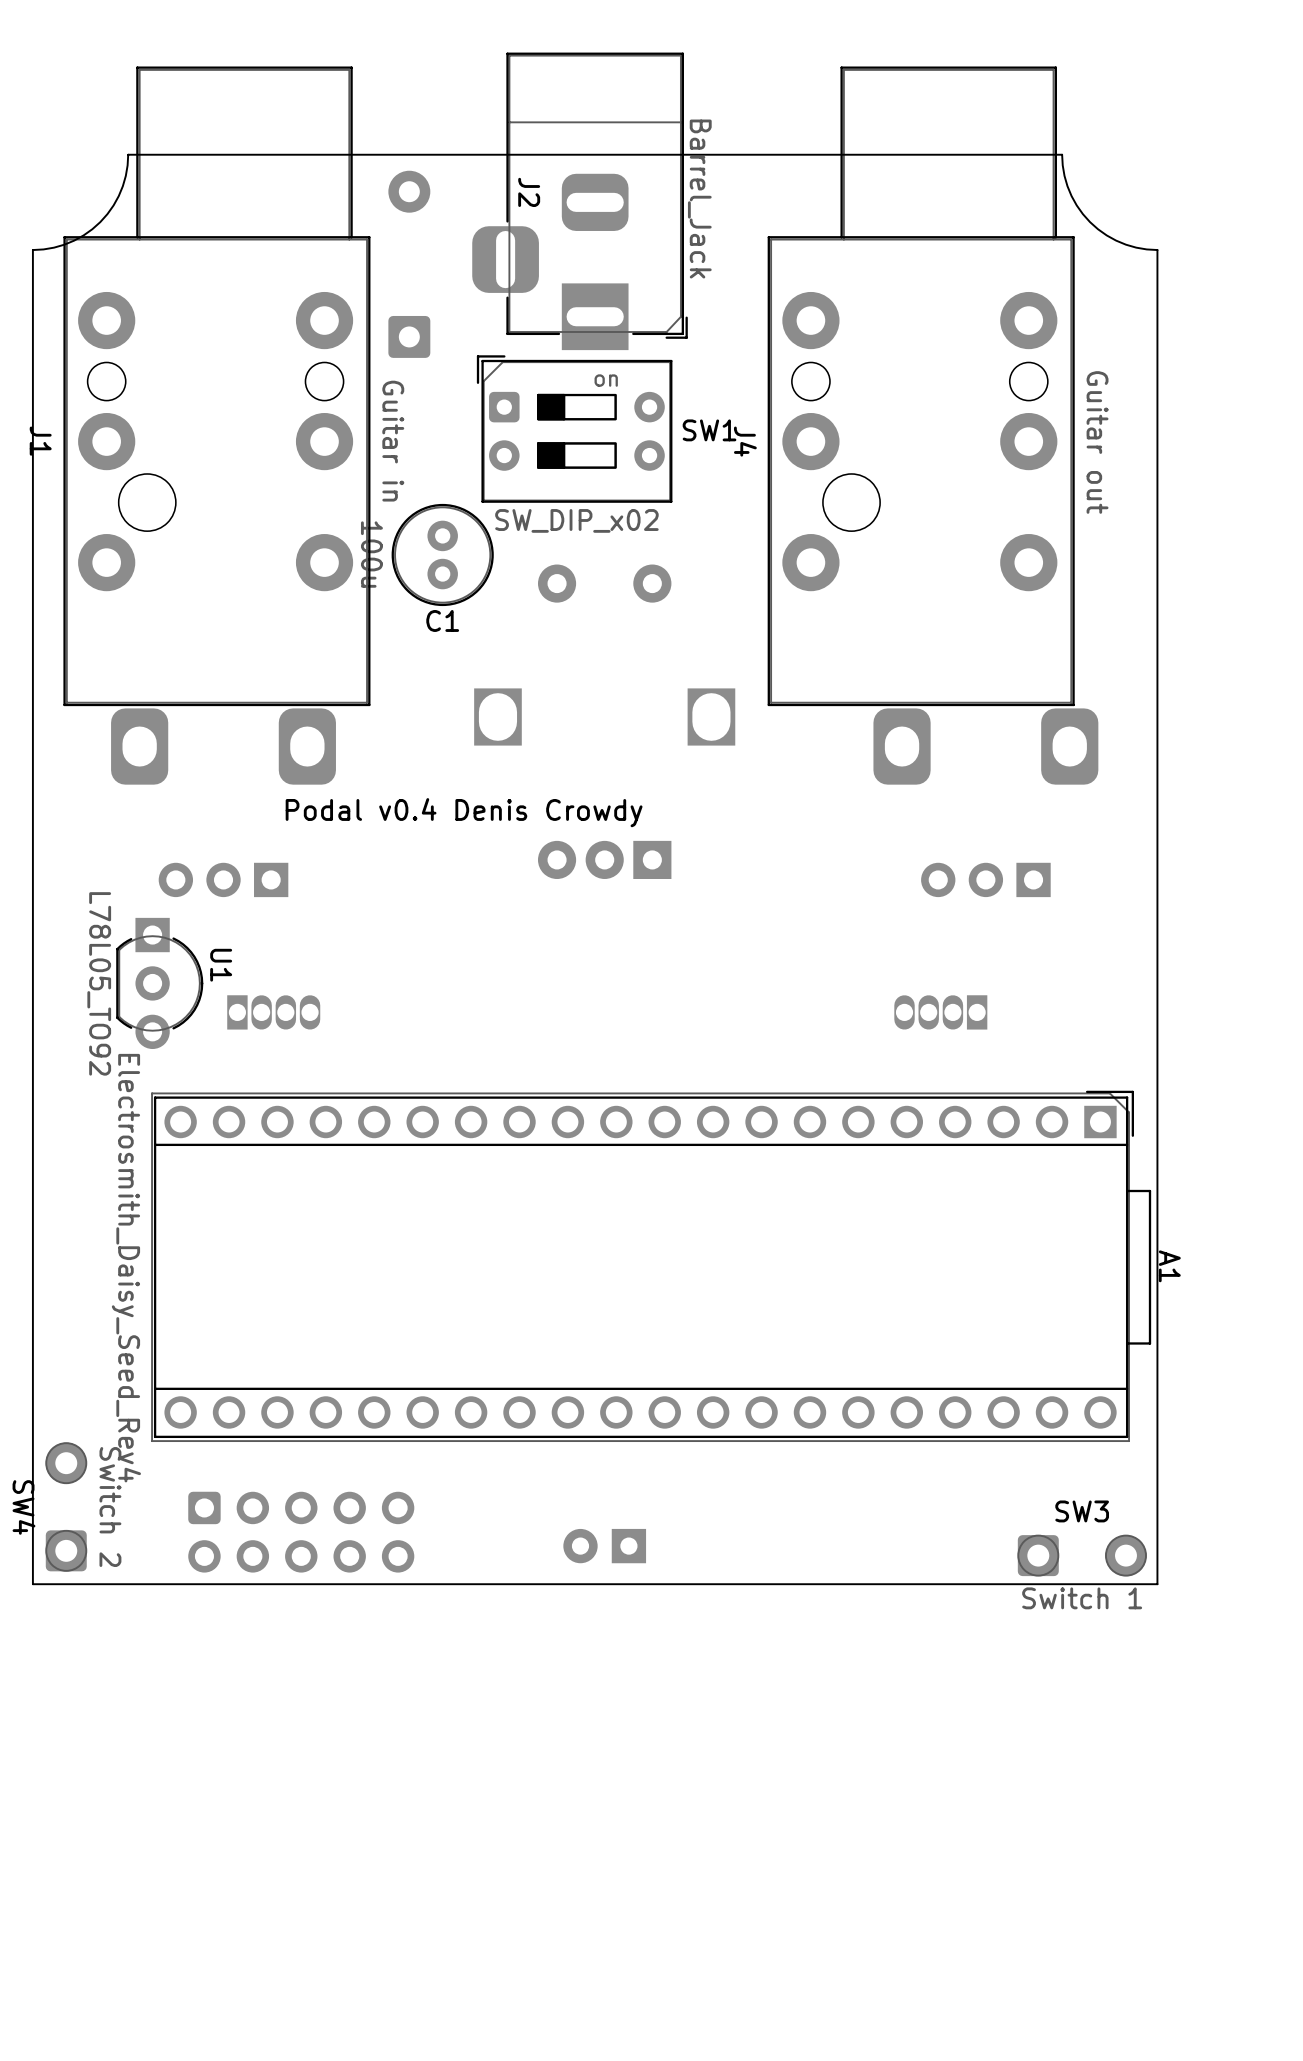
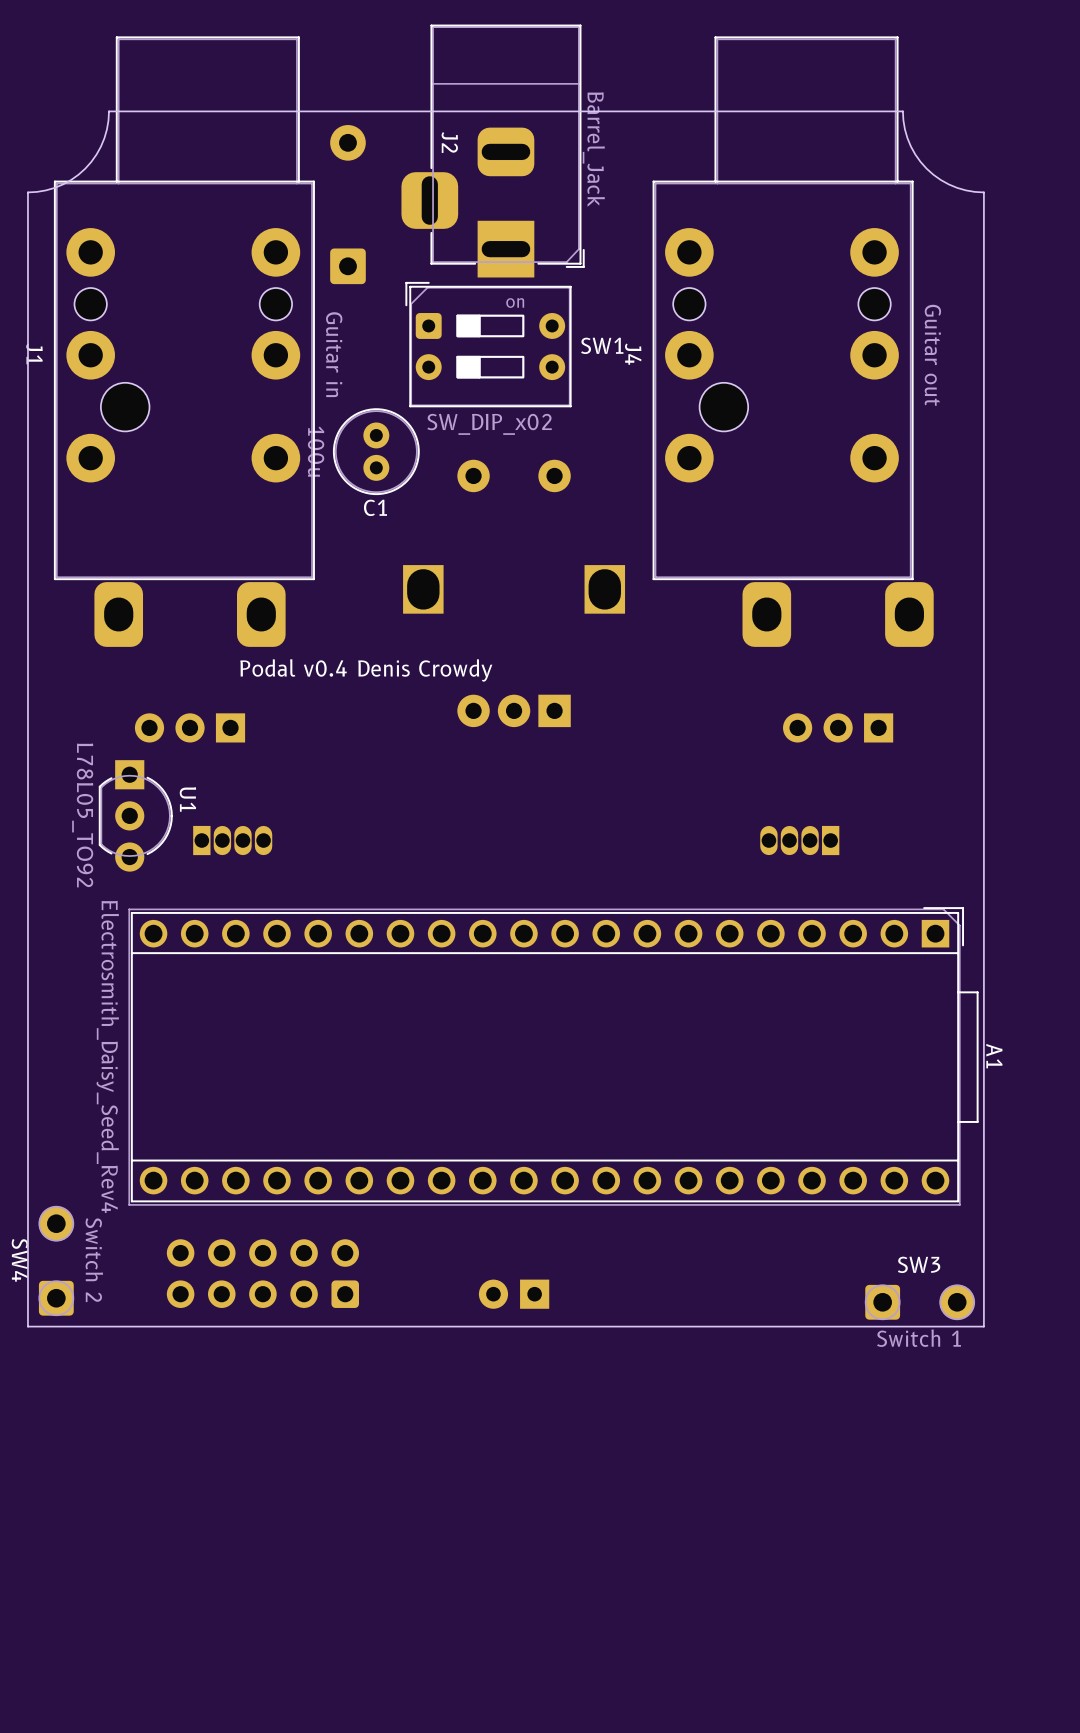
part rotation: 0° (301, 1532) -> 180° (262, 1273)

